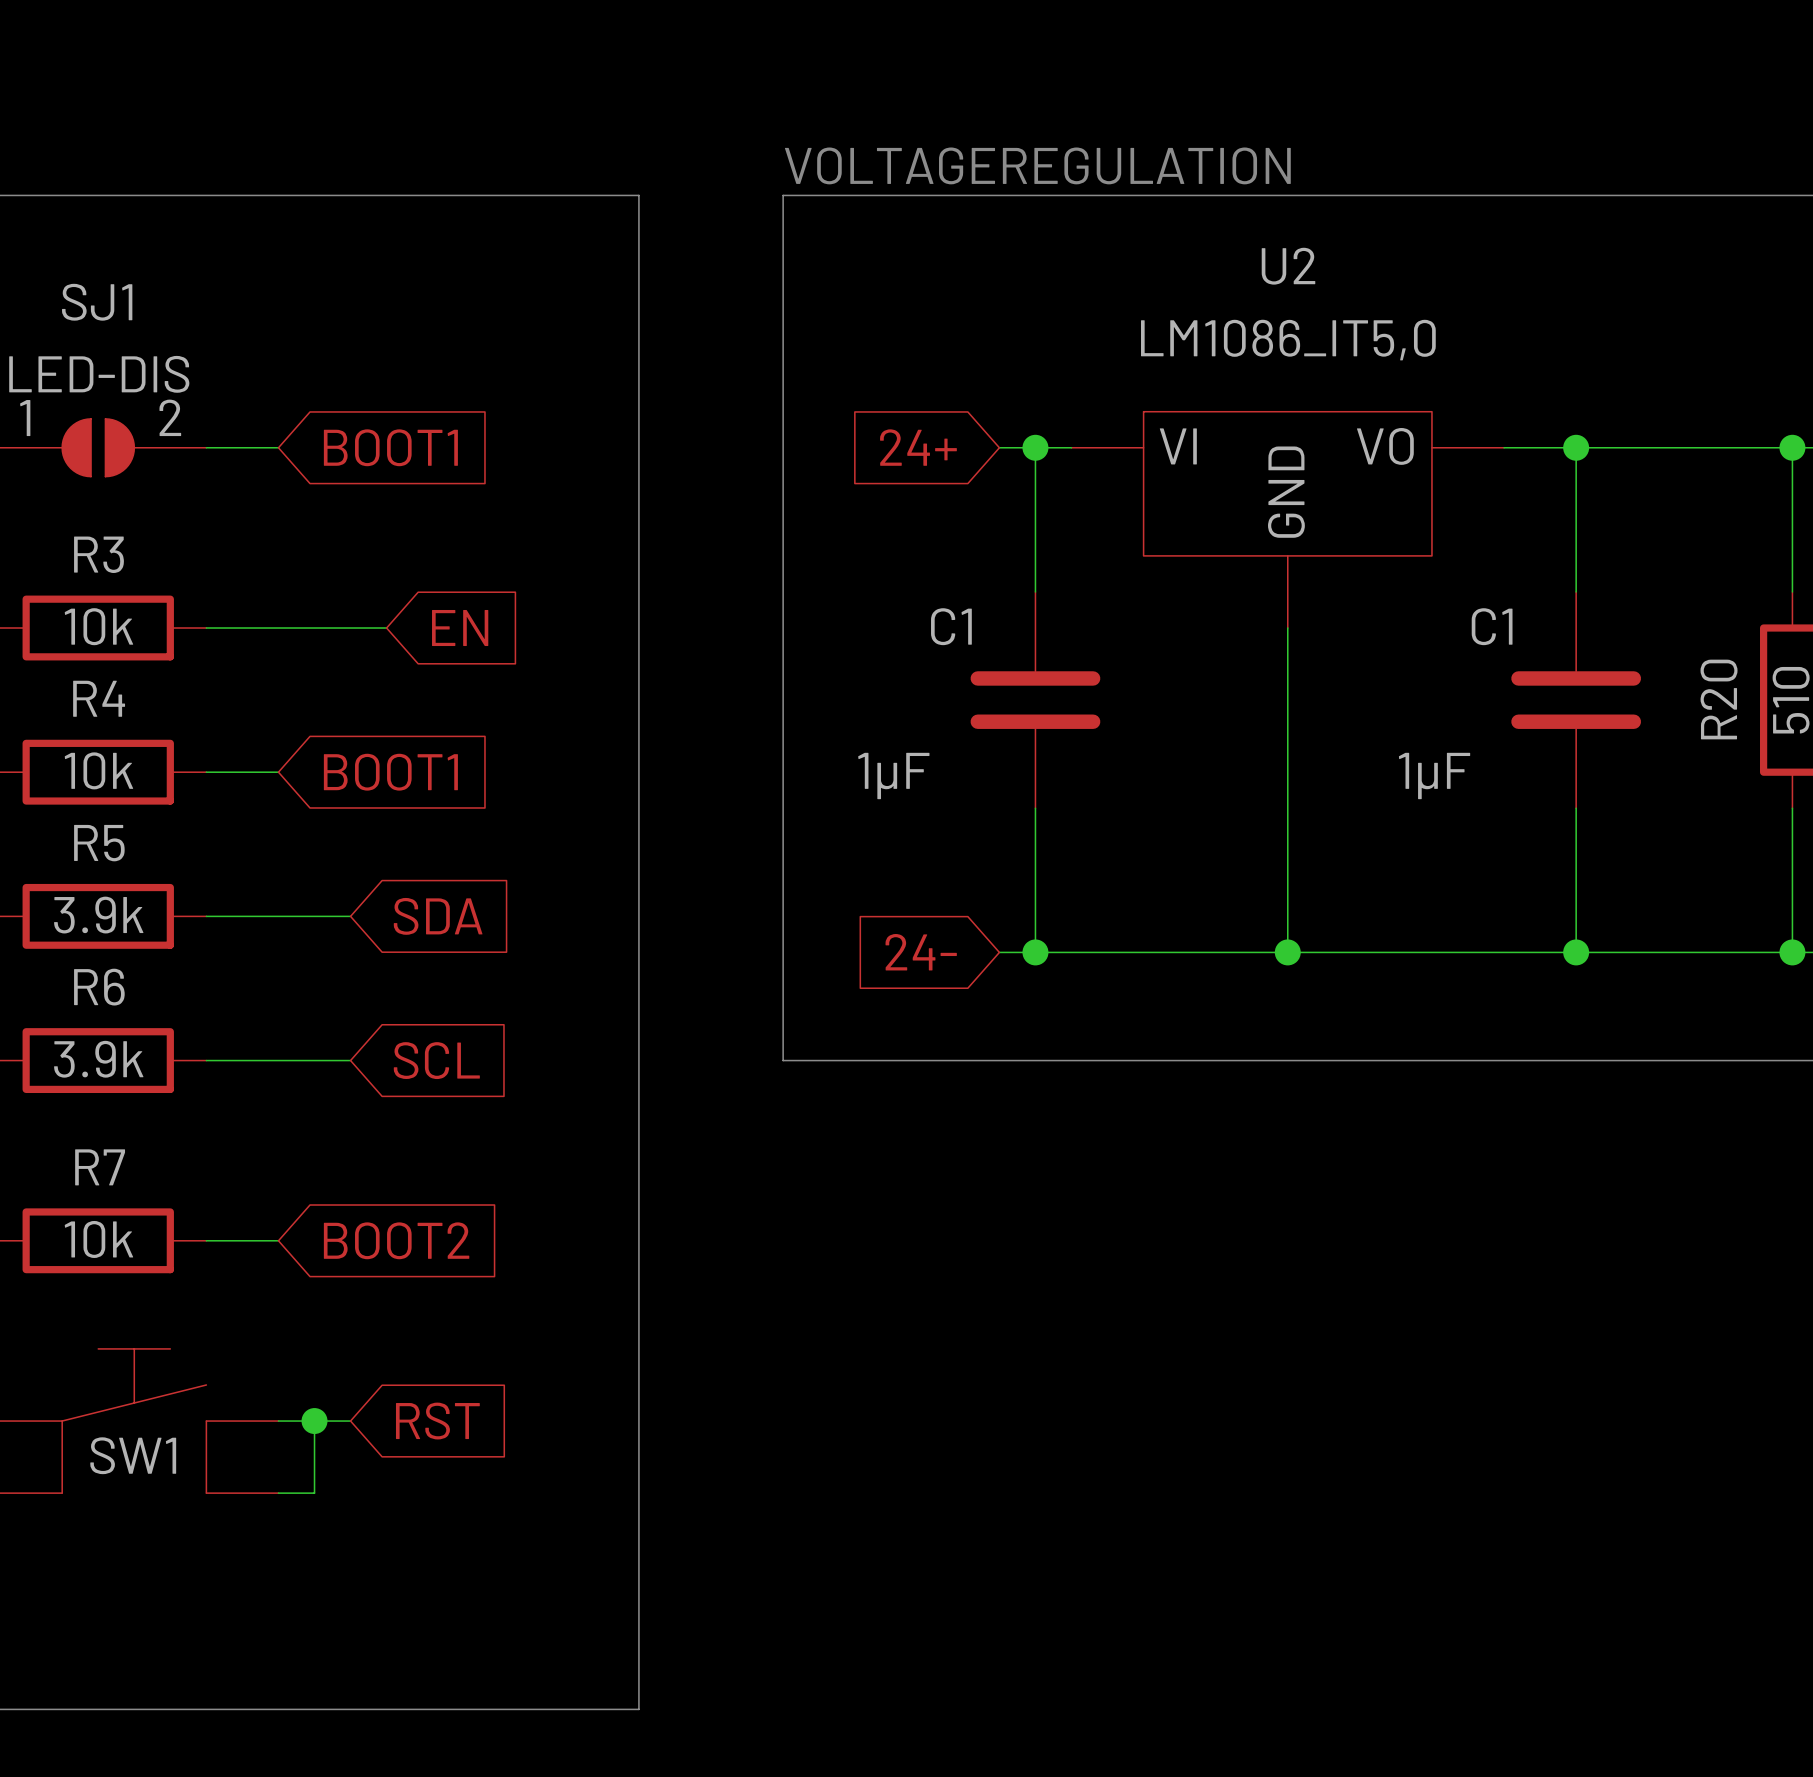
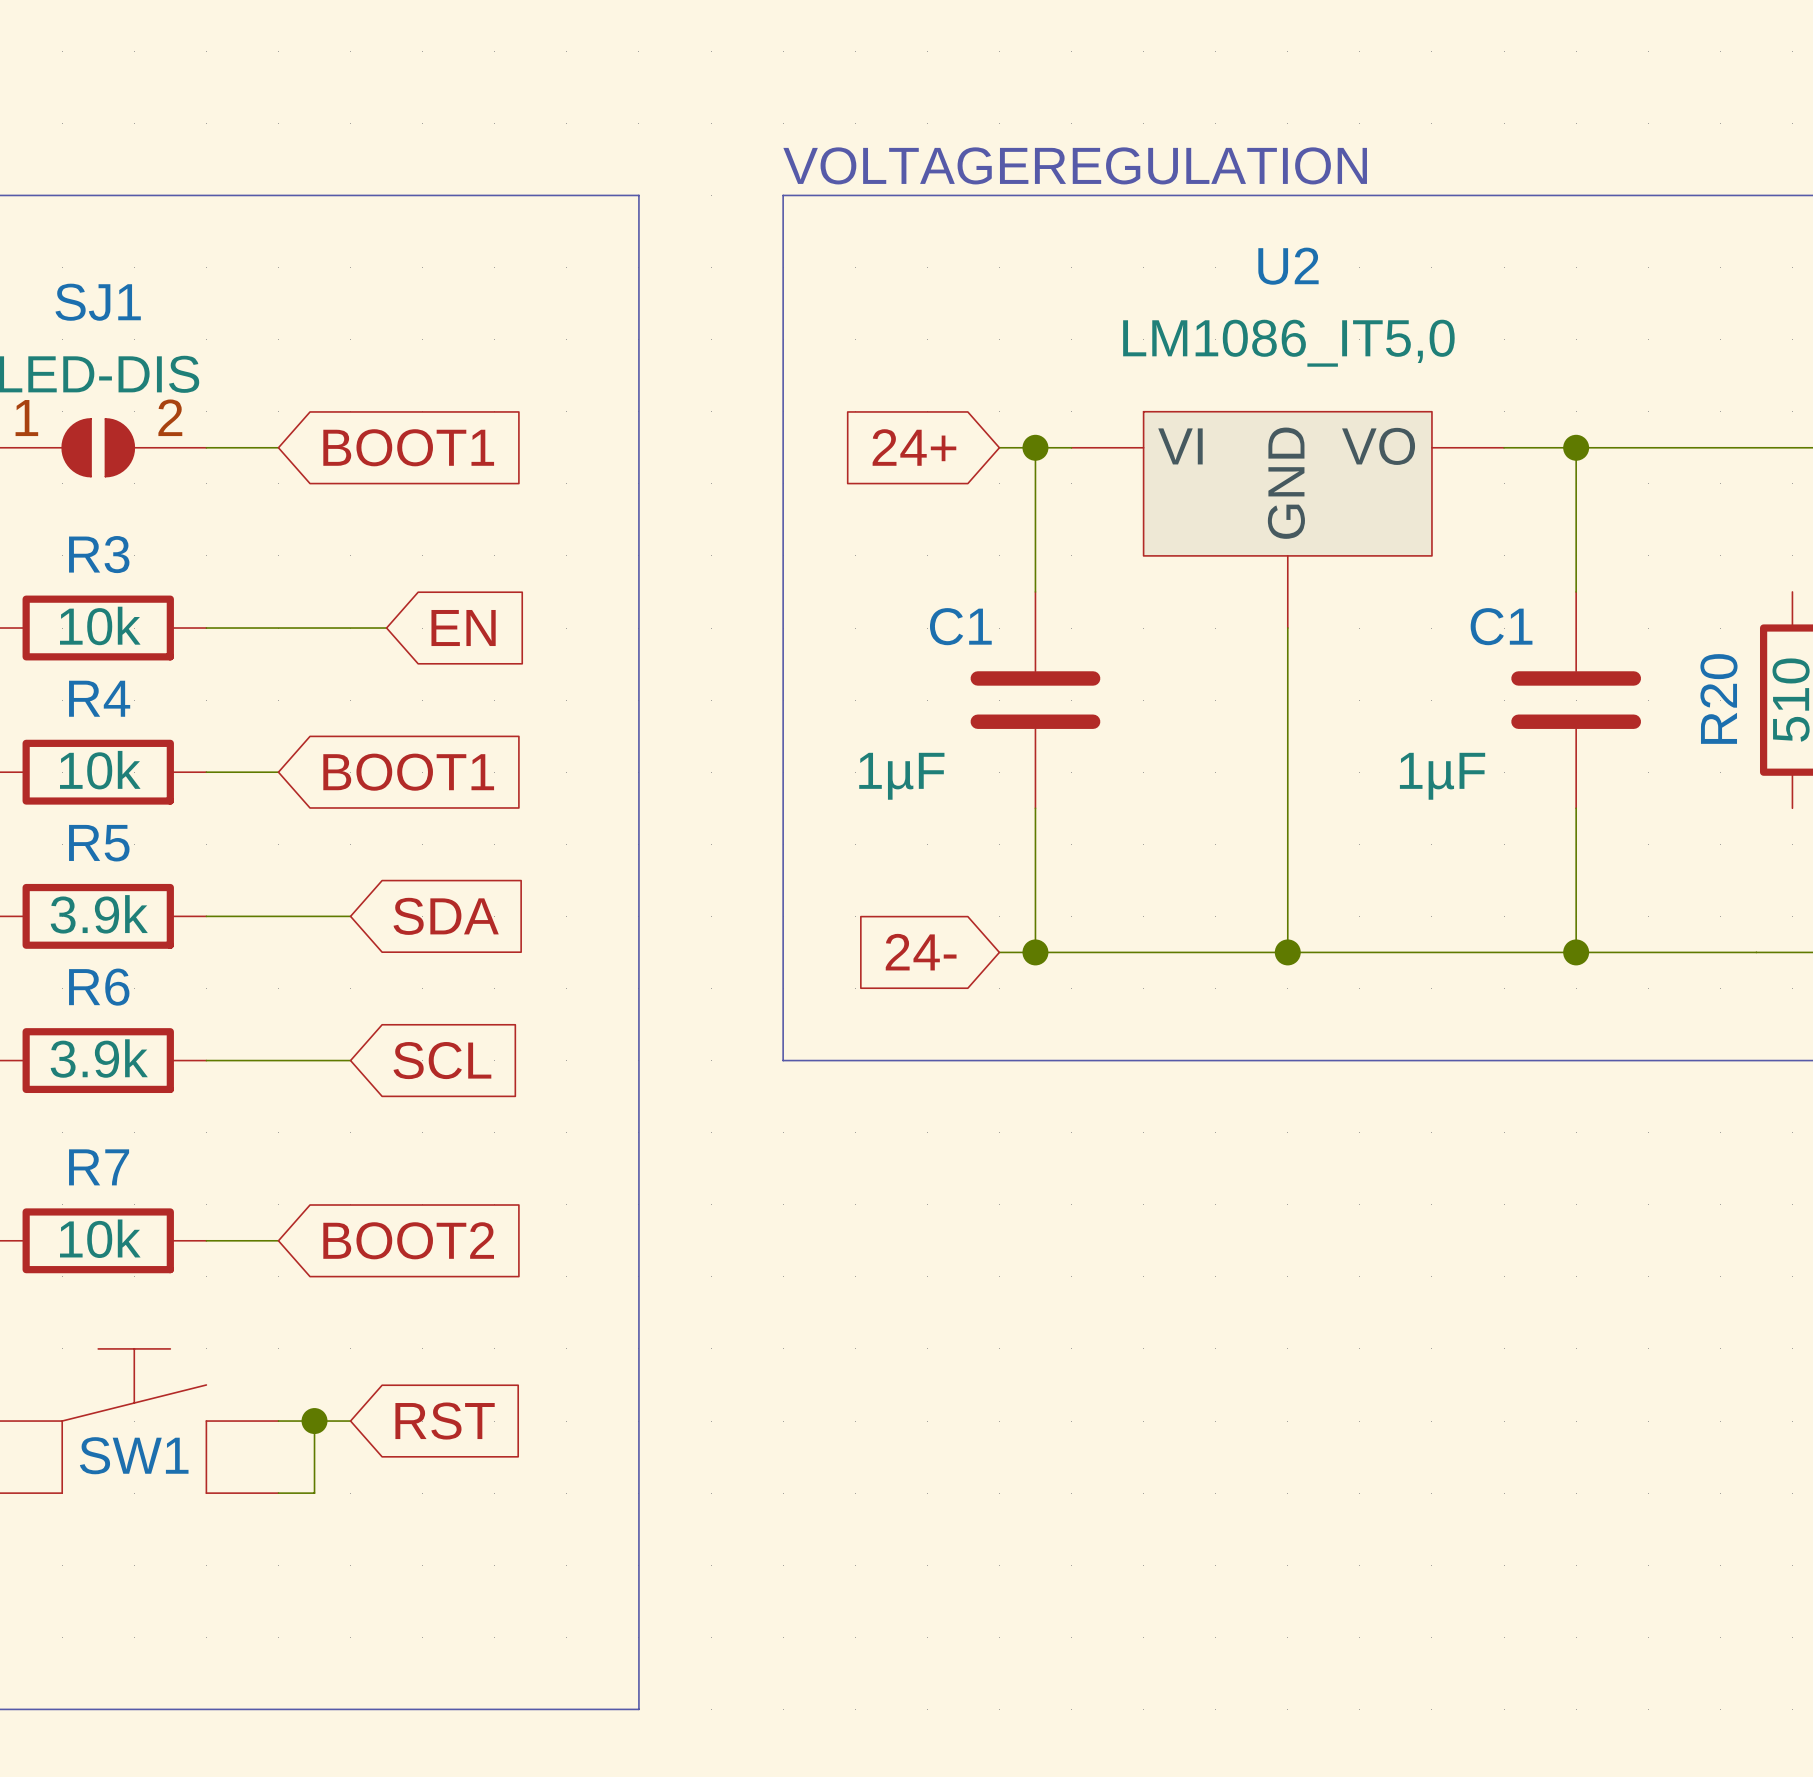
wire: (1792, 447) (1792, 591) -> none
junction: (1792, 447) -> none
wire: (1792, 808) (1792, 952) -> none
junction: (1792, 952) -> none

